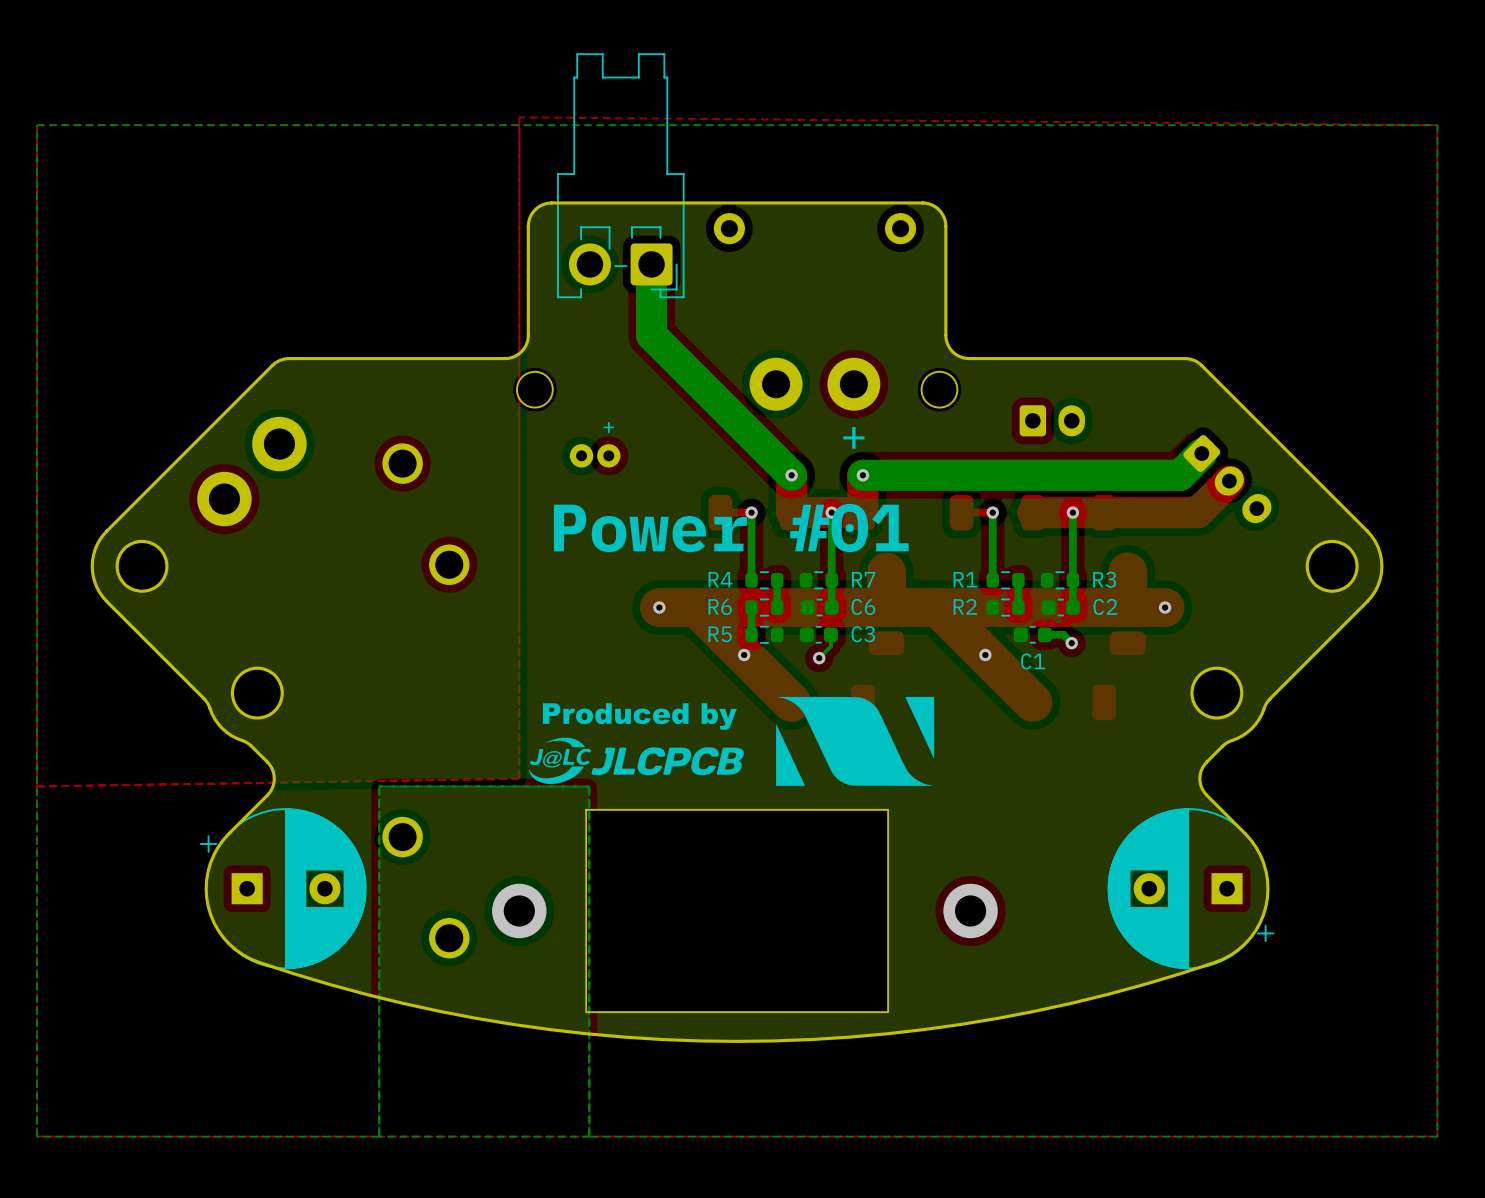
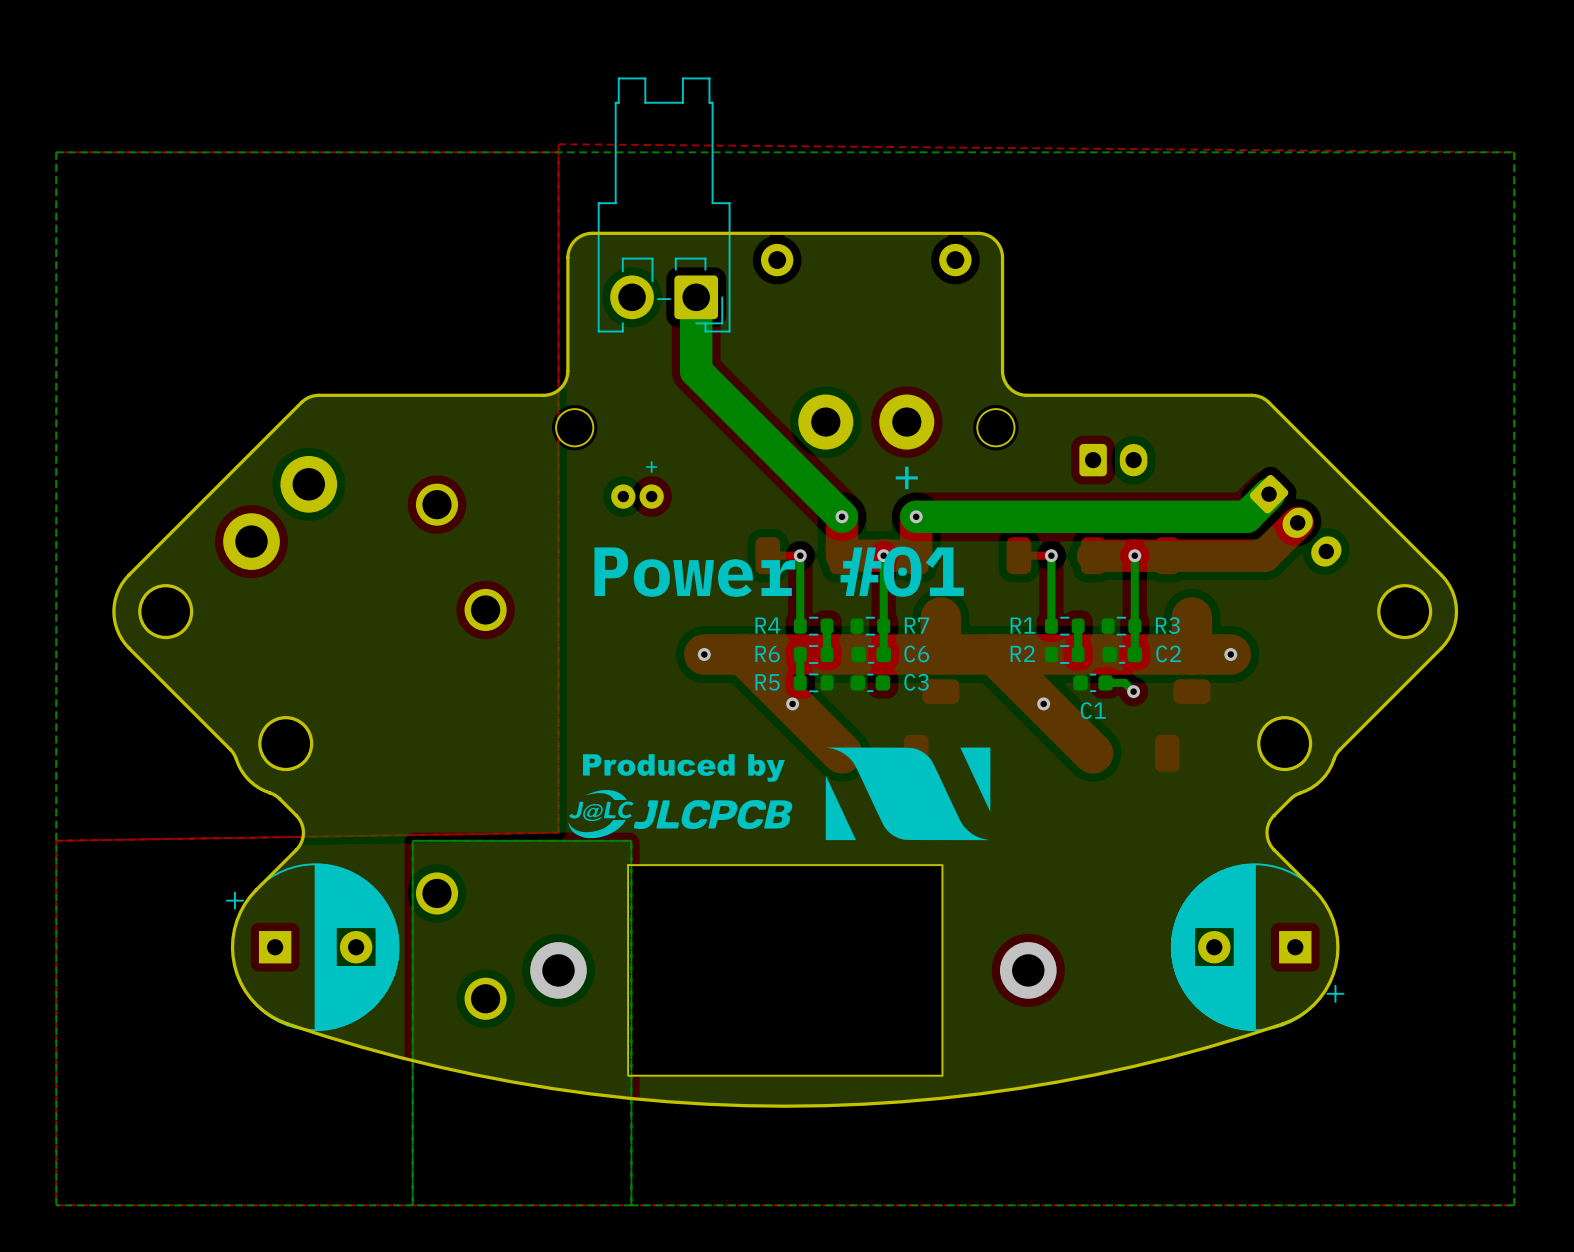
bottom track: (830, 634) (830, 646) (819, 658) -> none
via: (819, 658) -> none

